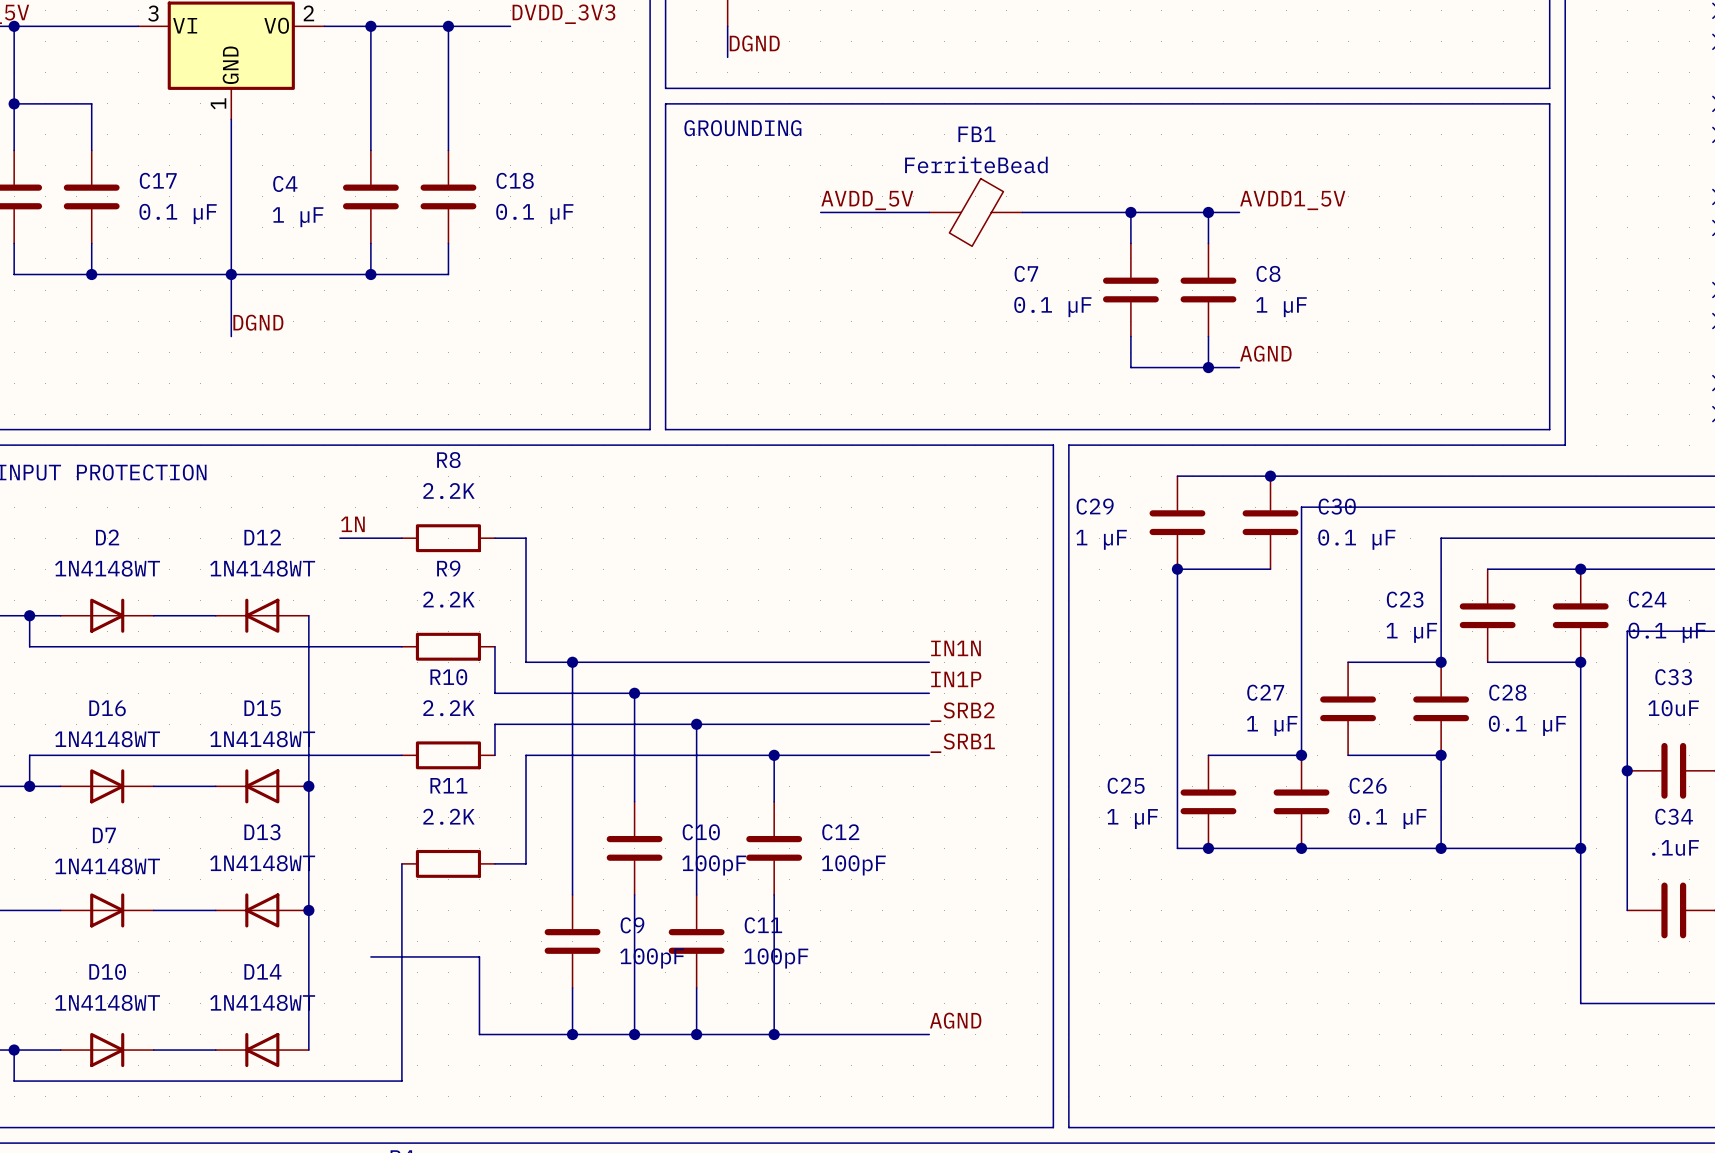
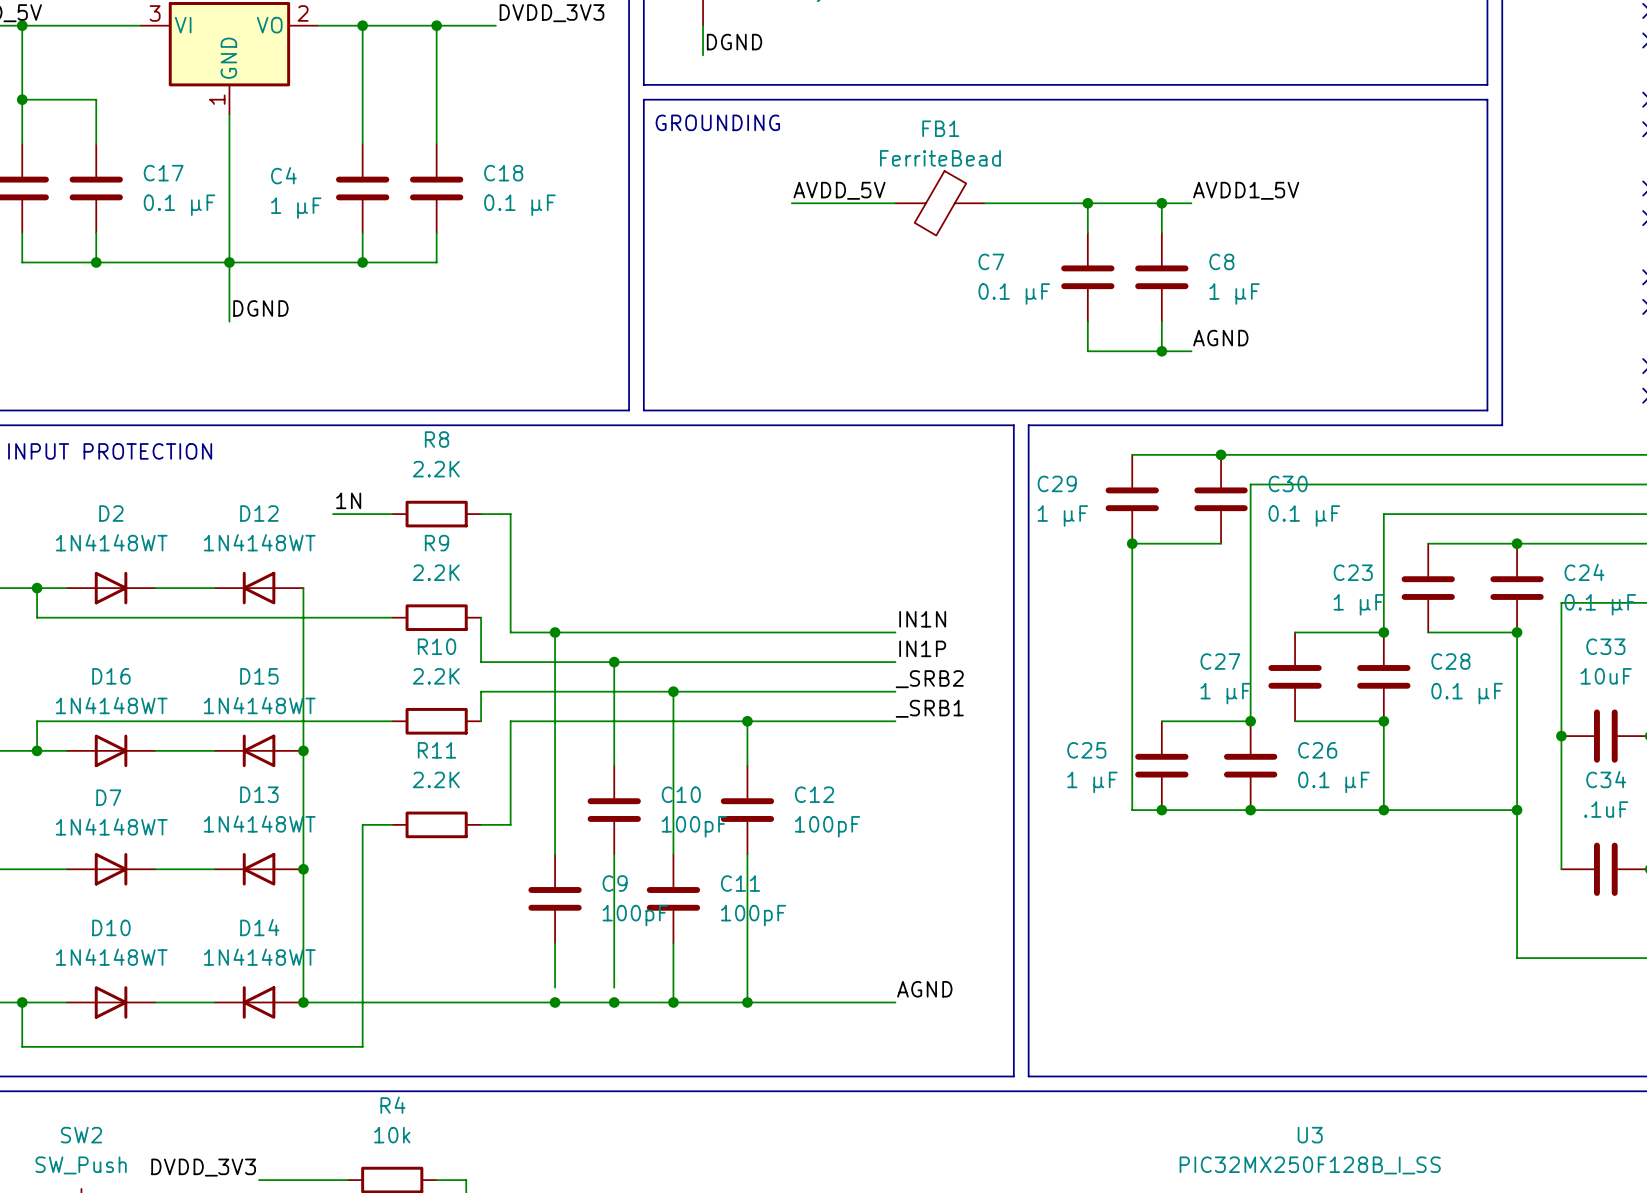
wire: (401, 863) (401, 1081) (14, 1081) -> (392, 824) (362, 824) (362, 1046) (22, 1046) (22, 1032)
wire: (370, 956) (479, 956) (479, 1034) (929, 1034) -> none
label position: AGND (955, 1020) -> AGND (924, 989)
junction position: (572, 1034) -> (555, 1002)
junction position: (634, 1034) -> (614, 1002)
wire: none -> (673, 987) (673, 1002)
junction position: (696, 1034) -> (673, 1002)
wire: none -> (747, 987) (747, 1002)
junction position: (774, 1034) -> (747, 1002)
wire: none -> (303, 1002) (895, 1002)
junction: none -> (303, 1002)

